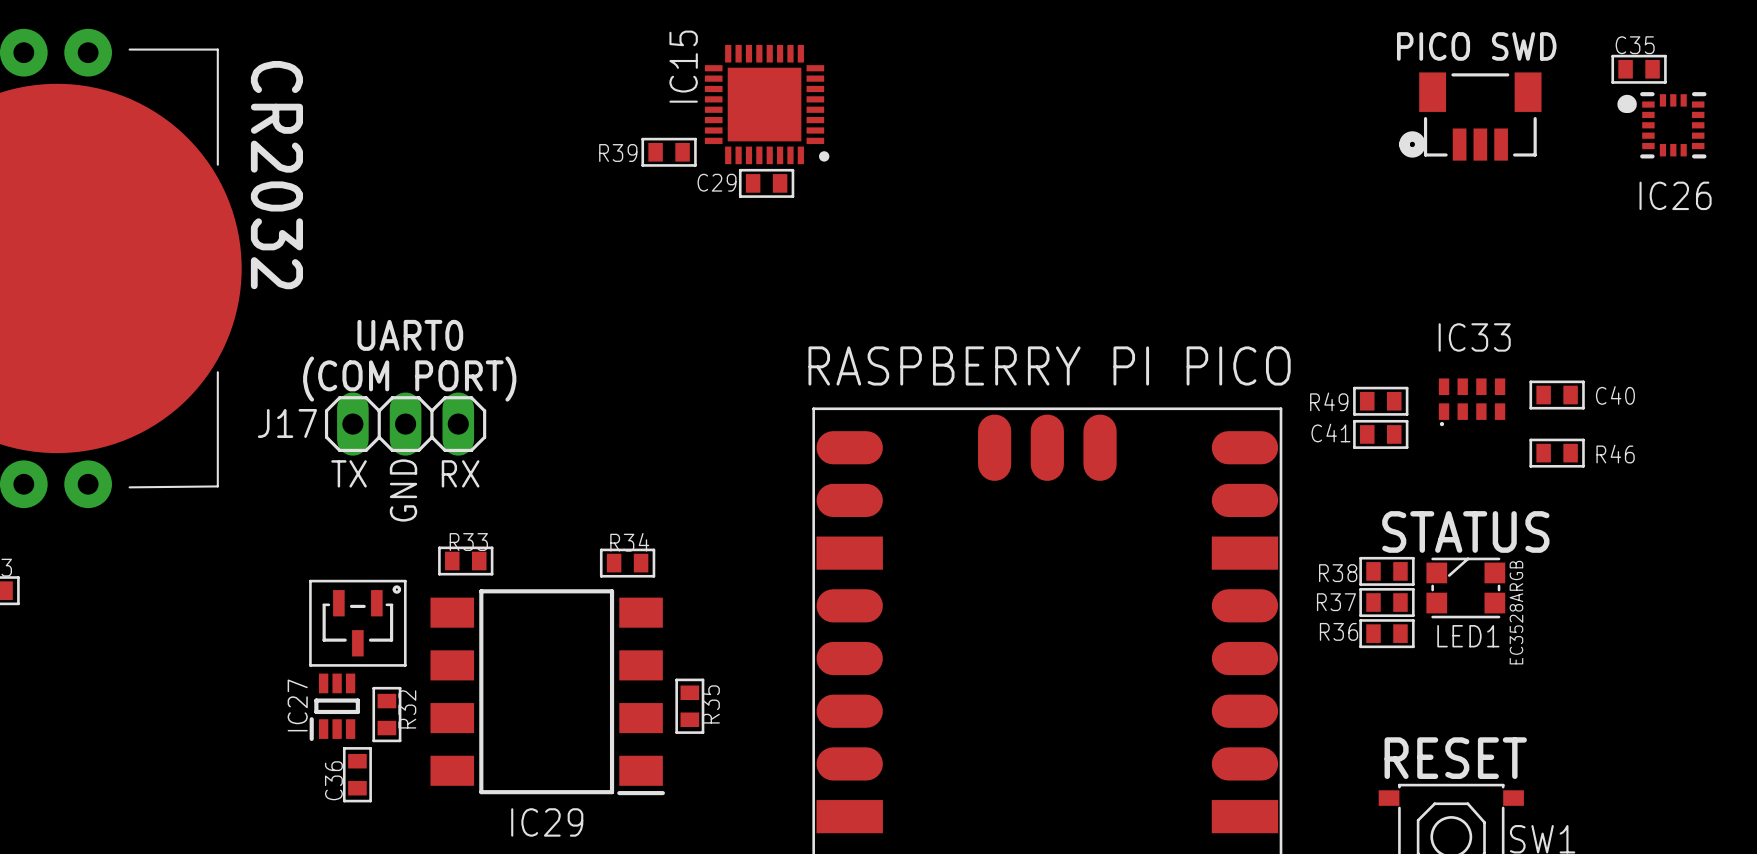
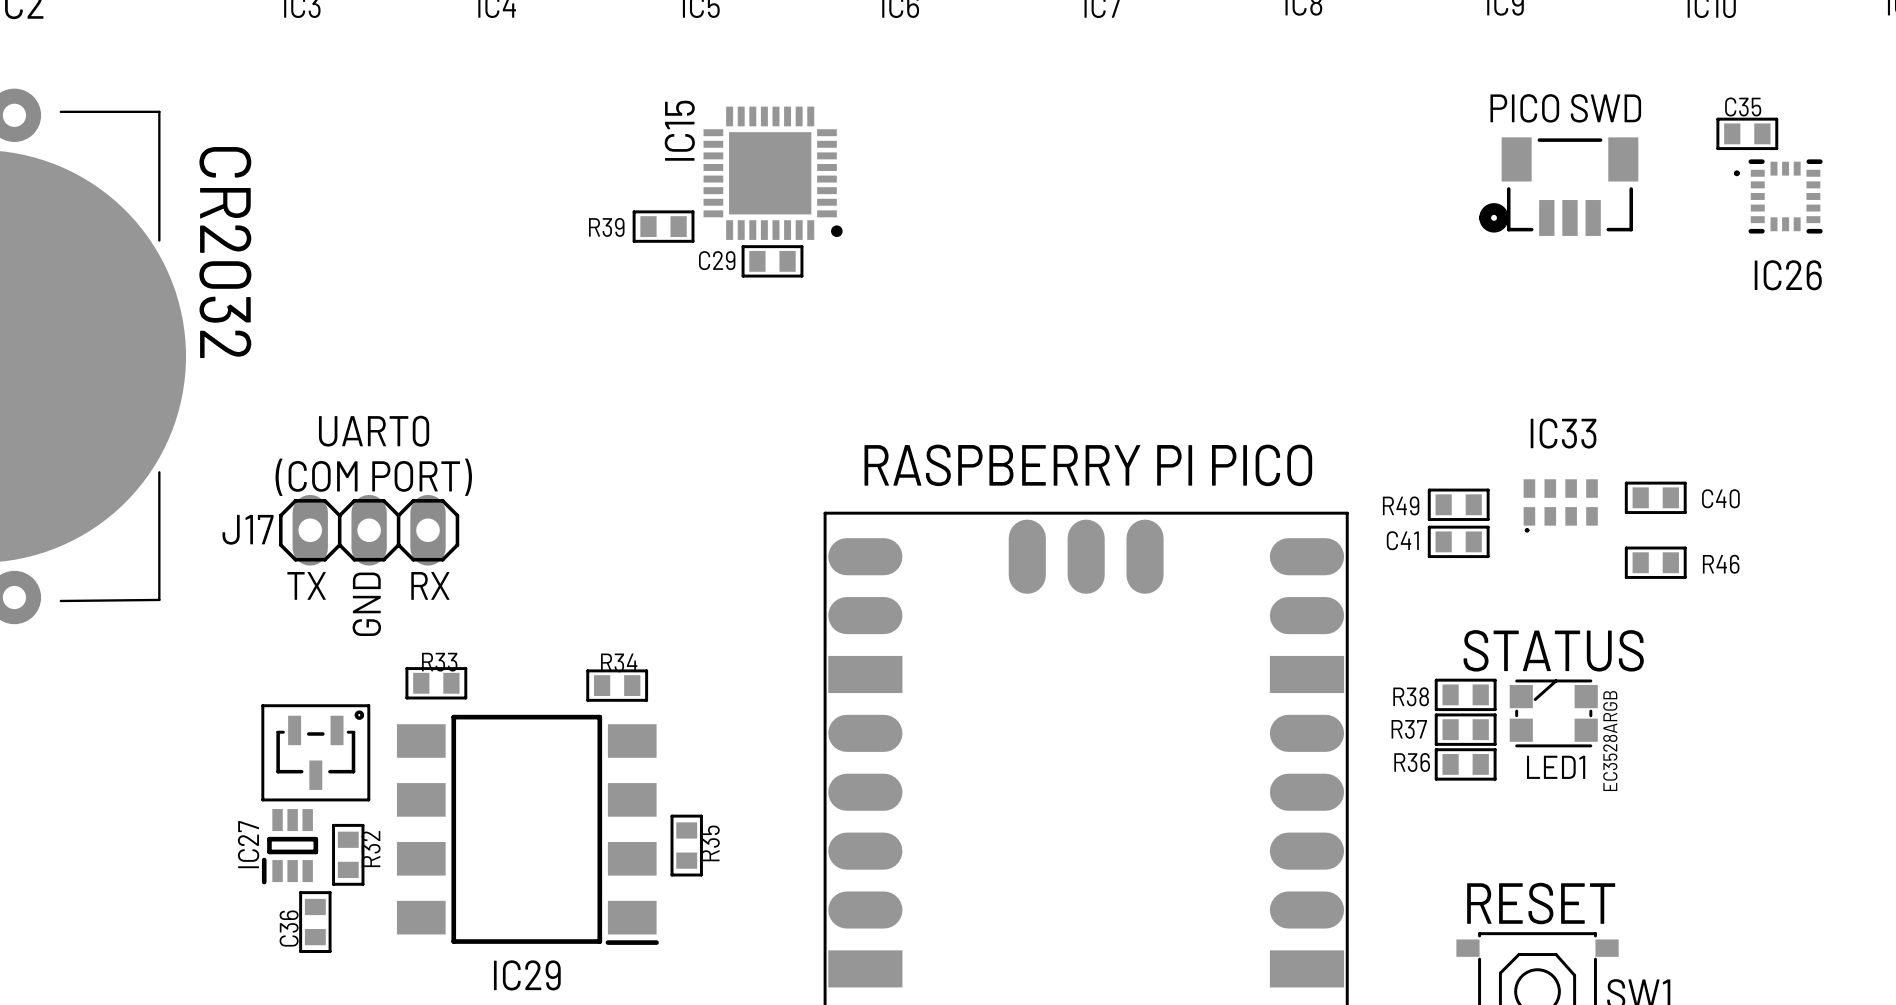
IC26 footprint: [1617, 92, 1707, 159] -> [1733, 159, 1823, 234]

